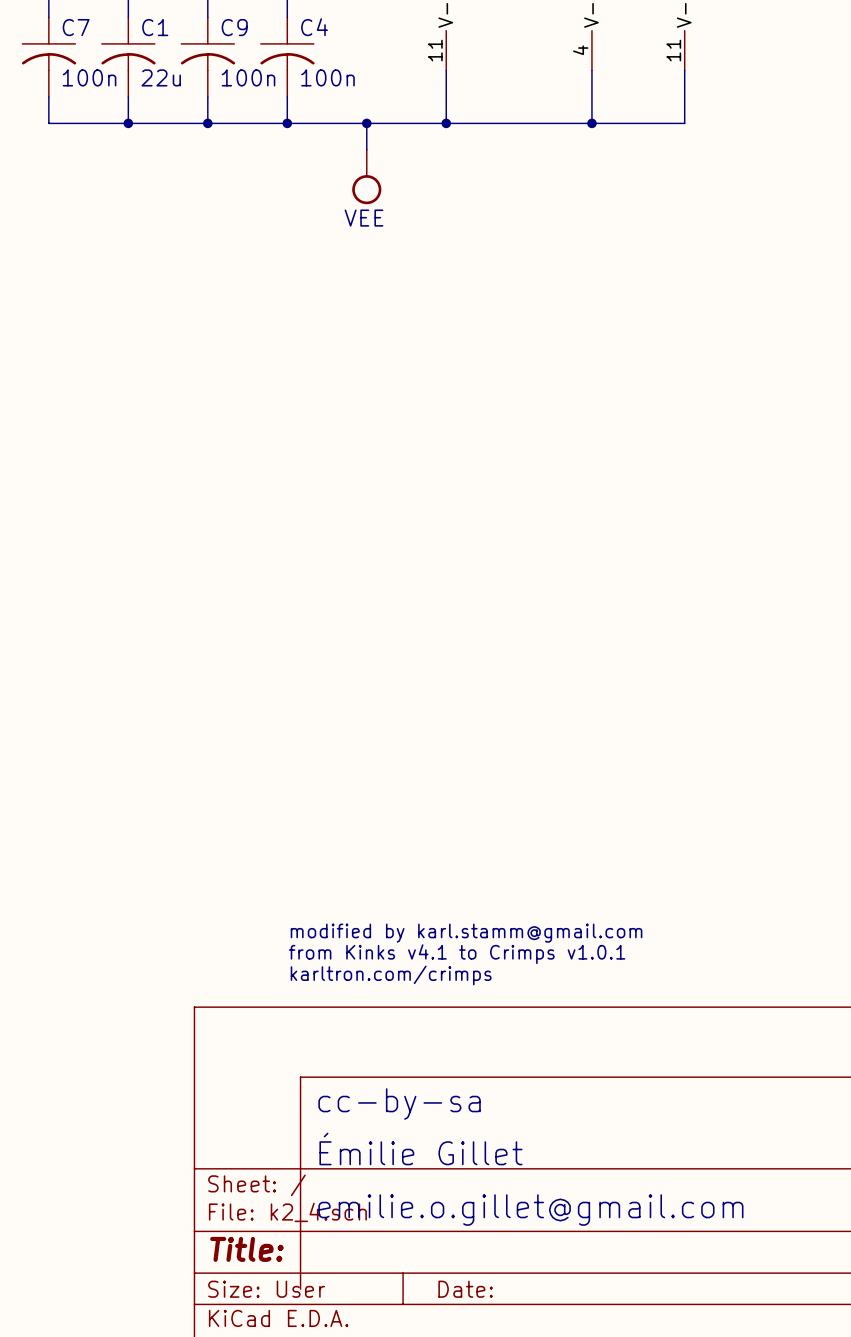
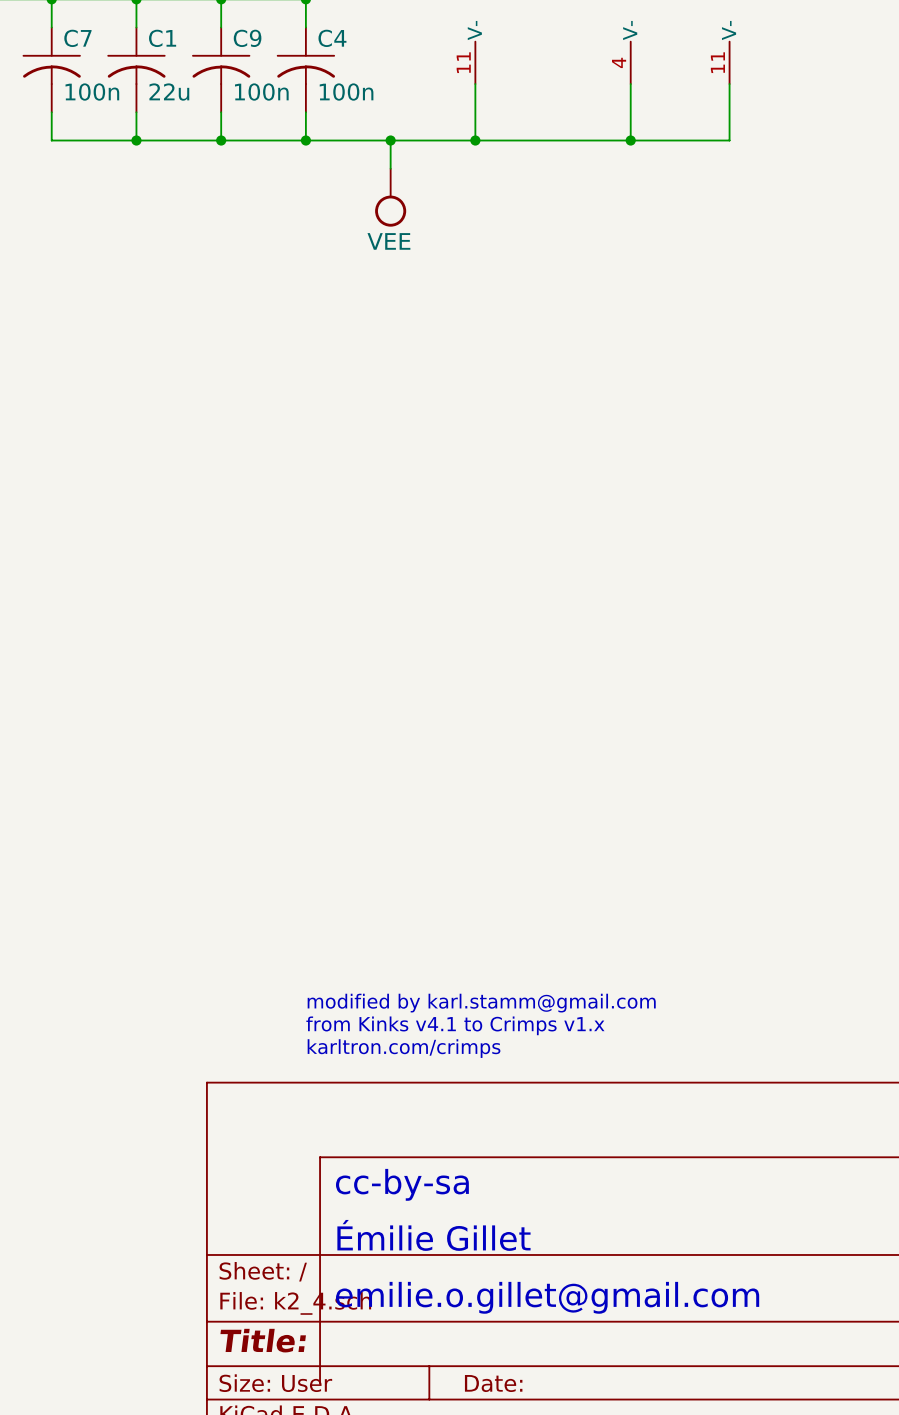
text: from Kinks v4.1 to Crimps v1.0.1 (457, 954) -> from Kinks v4.1 to Crimps v1.x (455, 1025)

